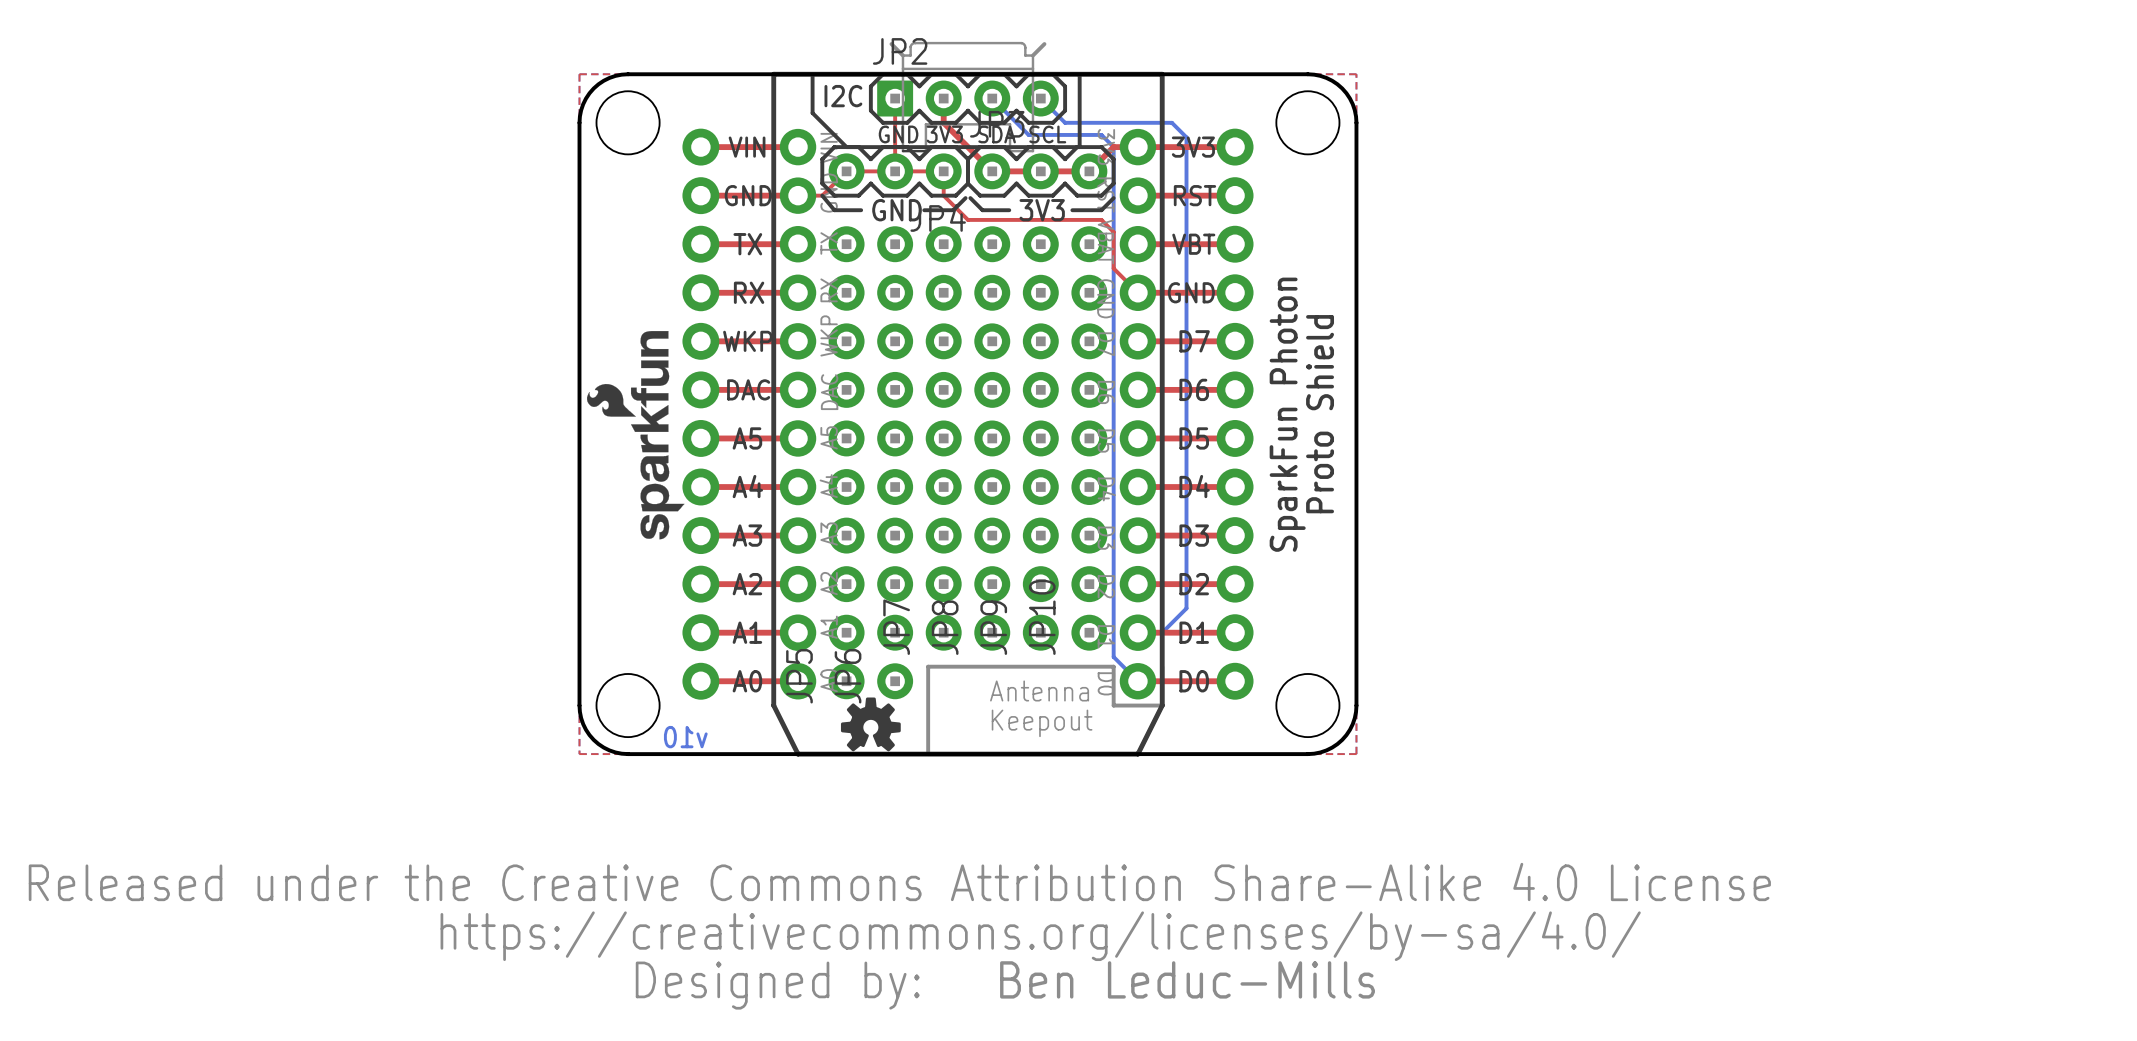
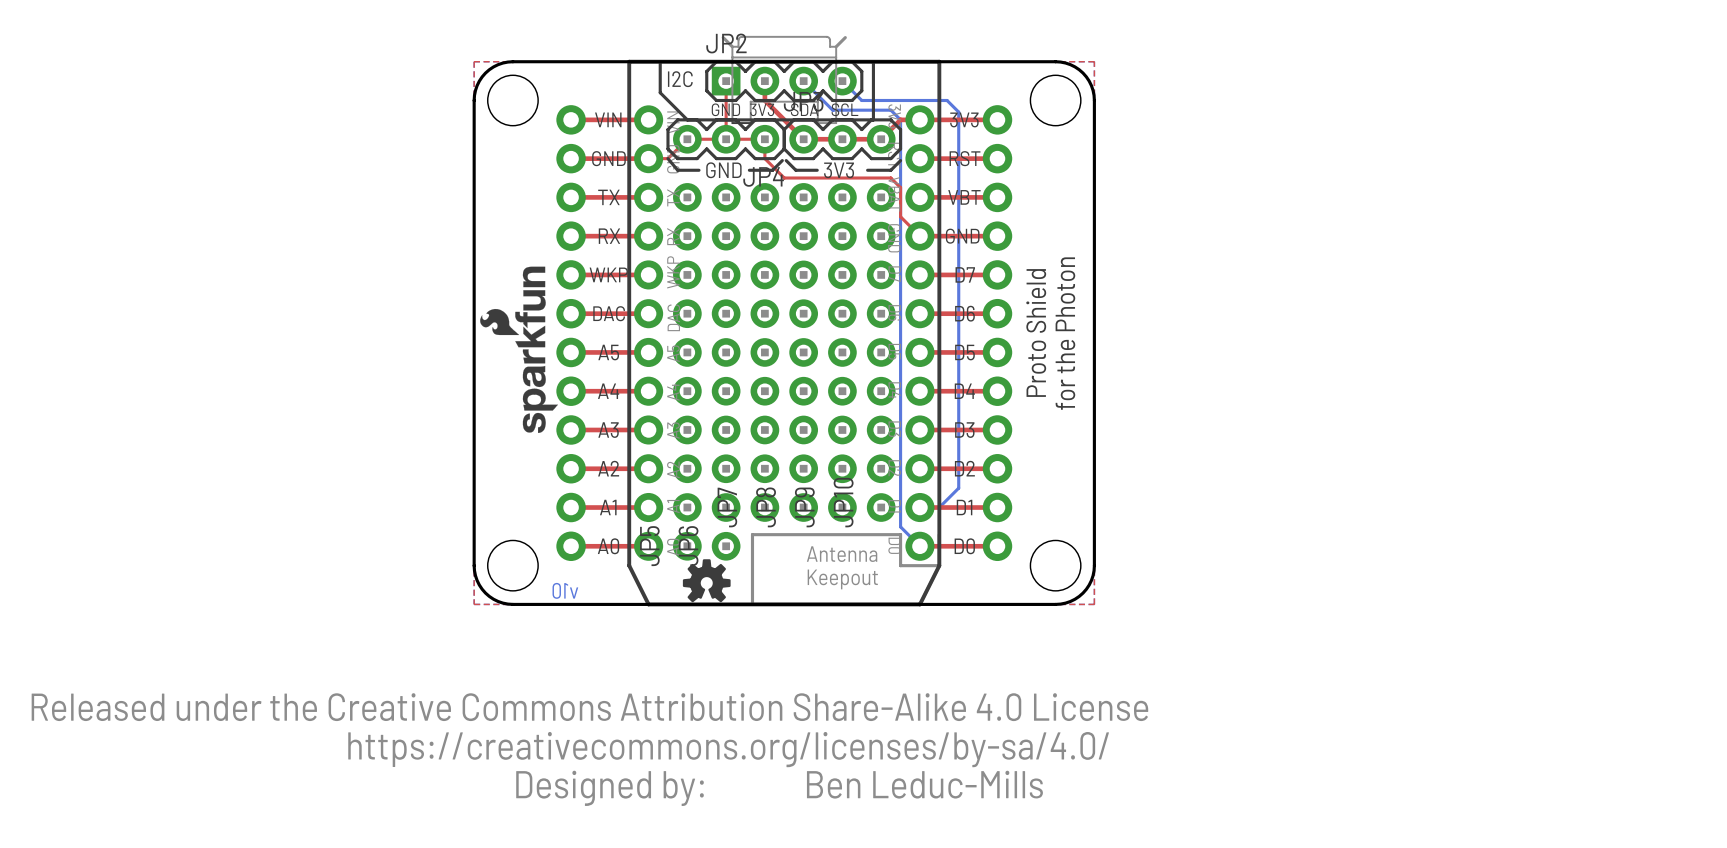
text: SparkFun Photon (1287, 414) -> Proto Shield (1036, 333)
text: Proto Shield (1320, 414) -> for the Photon (1065, 333)

